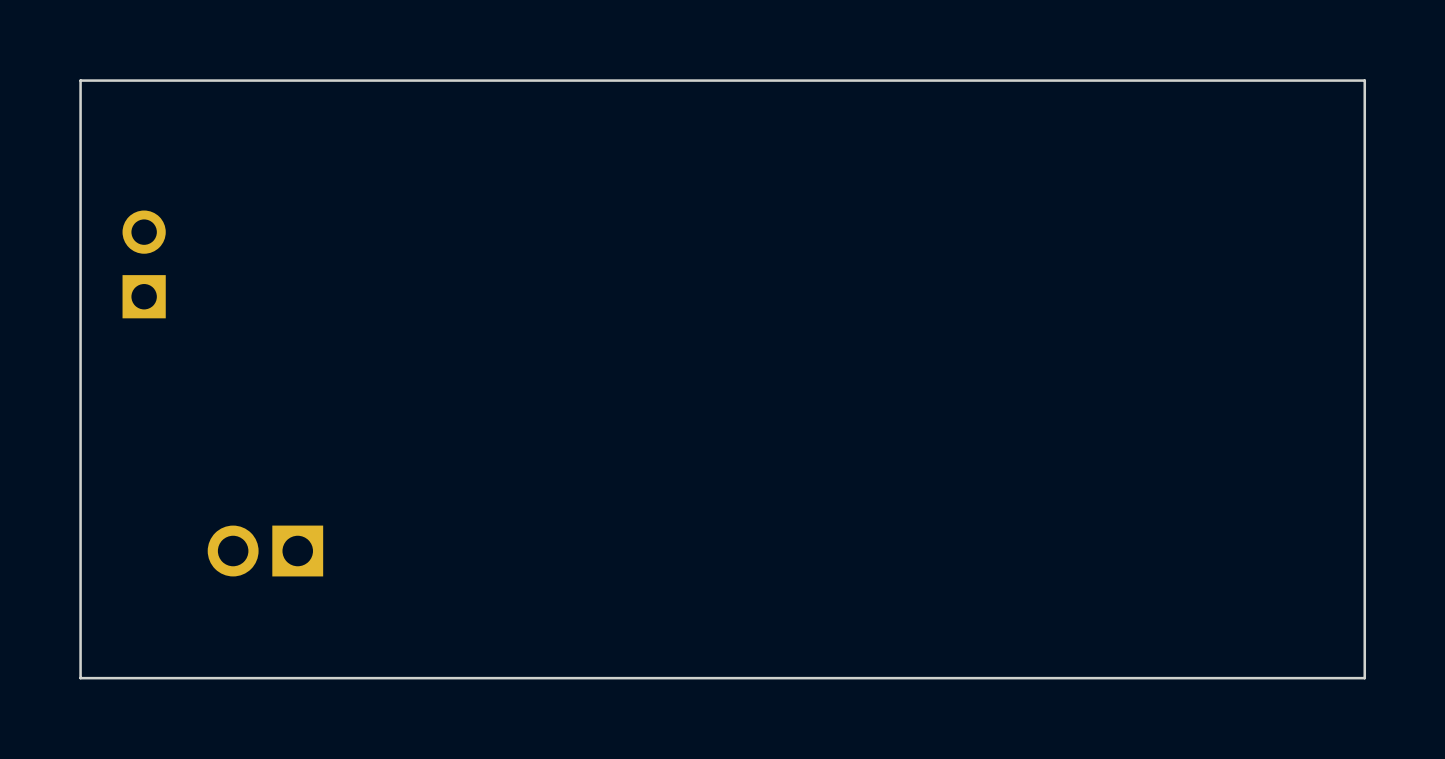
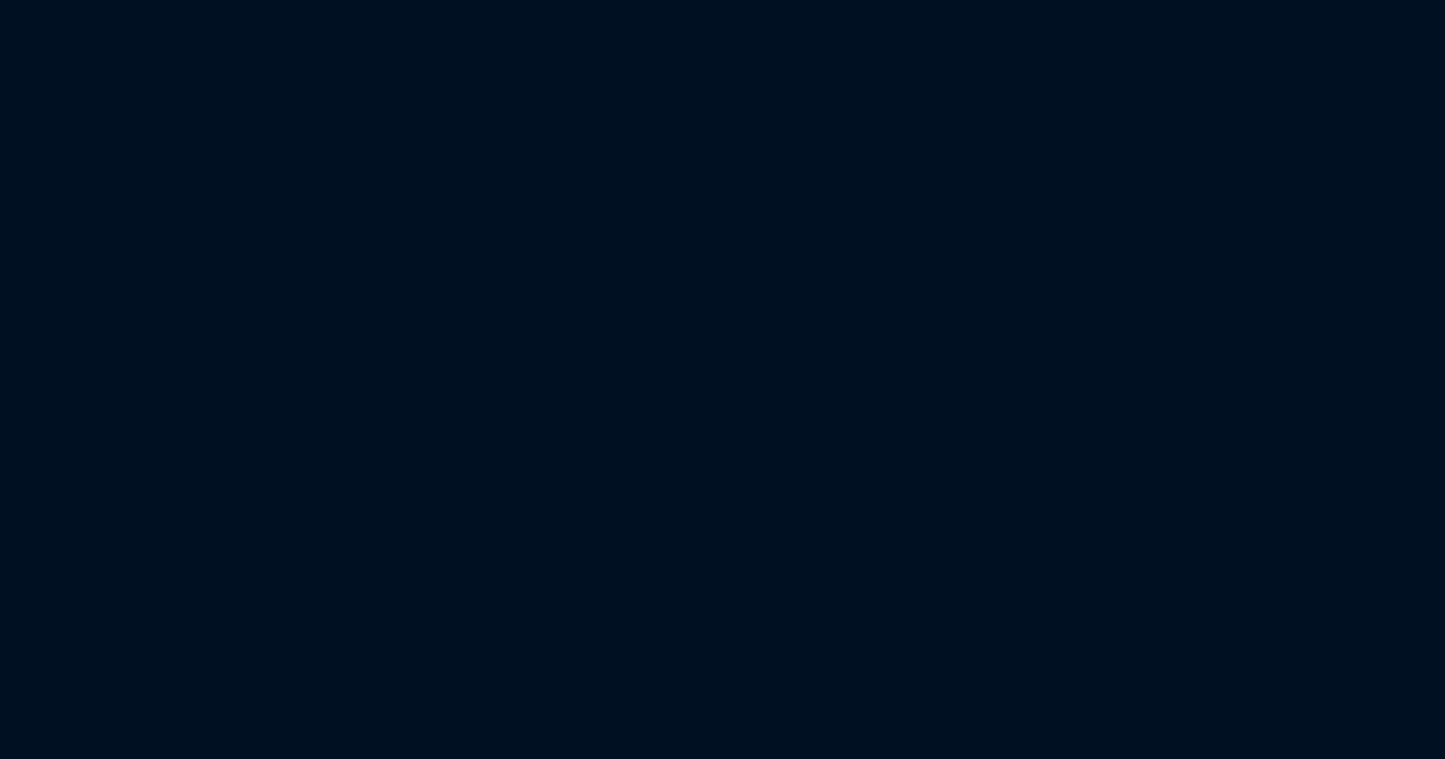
board edge: (1364, 80) (80, 80) (80, 678) (1364, 678) (1364, 80) -> none
part: (144, 264) -> none
part: (265, 551) -> none

